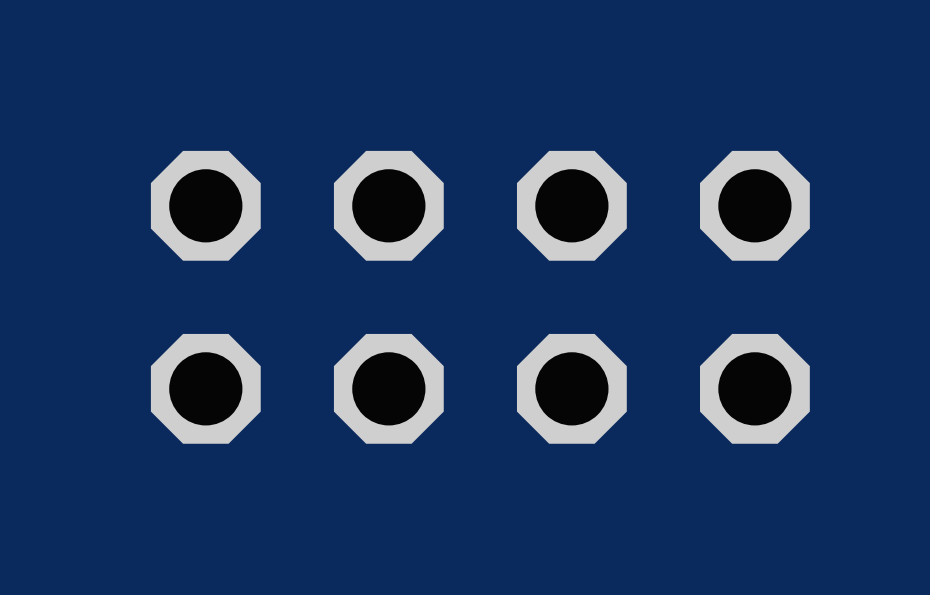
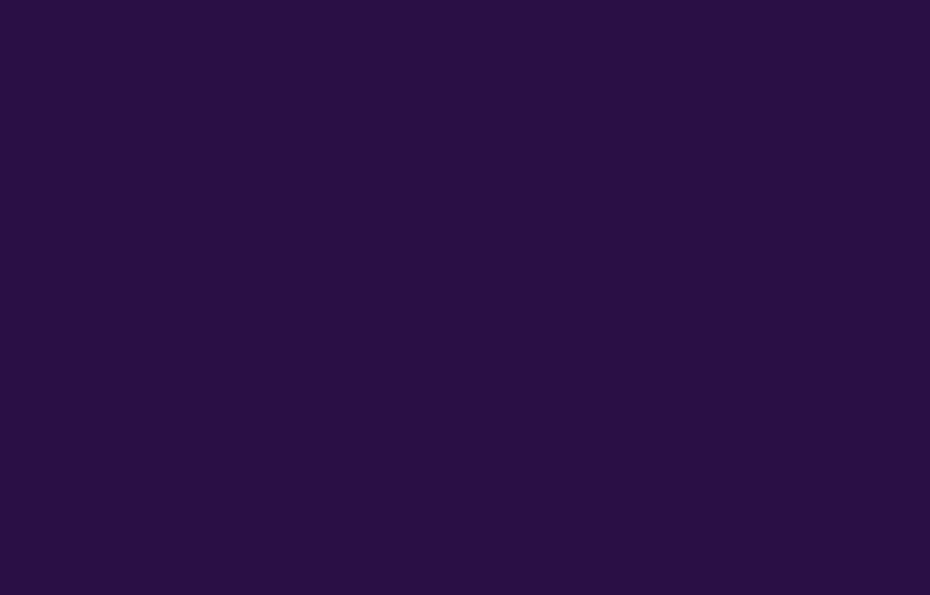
part: (480, 297) -> none

